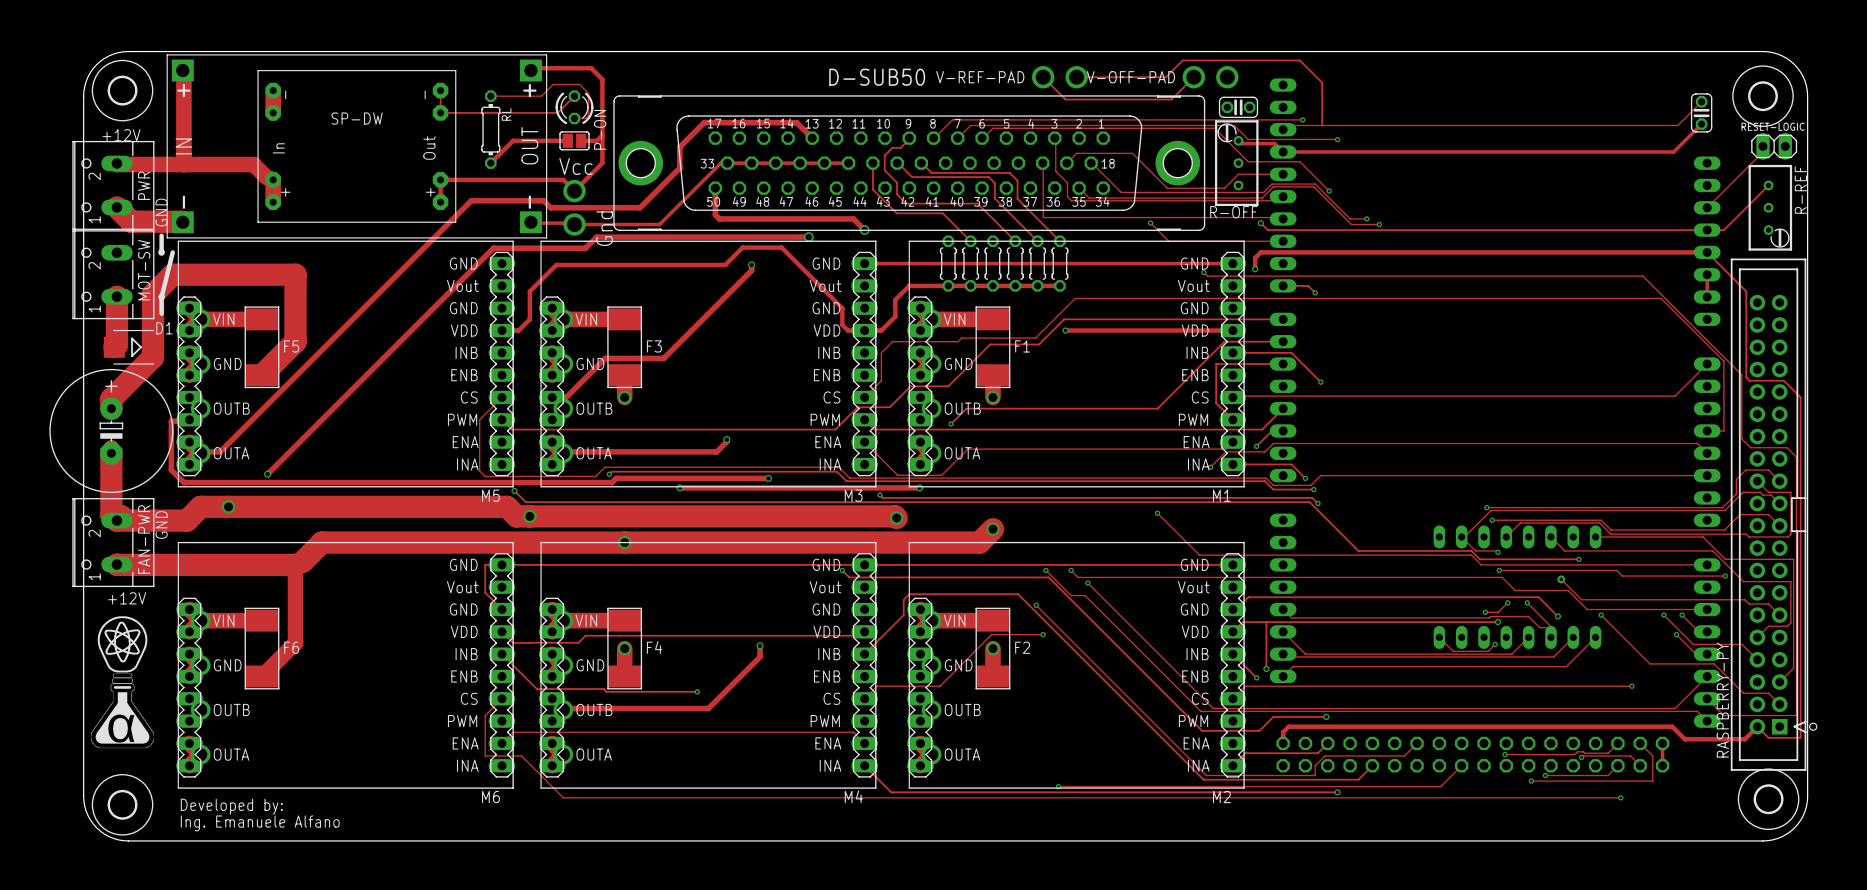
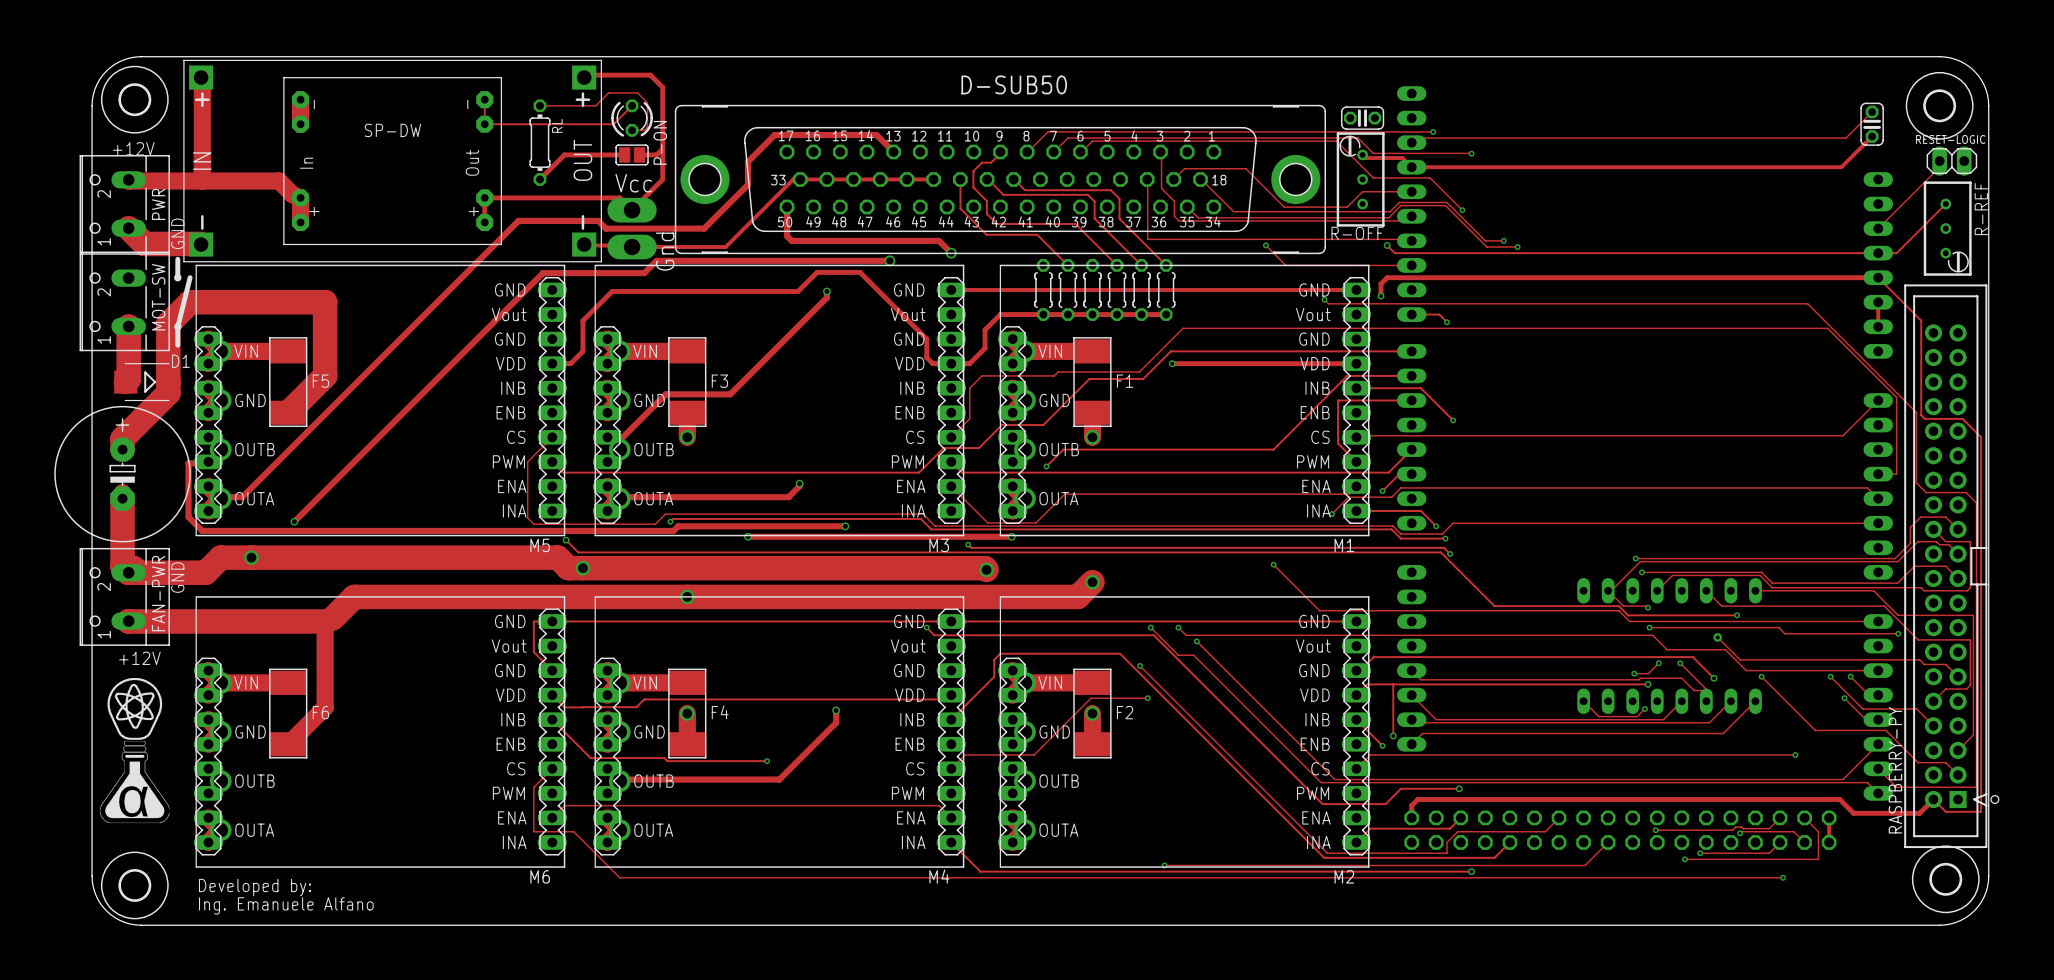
D-SUB50 name position: D-SUB50 (877, 77) -> D-SUB50 (1014, 84)
track: (1043, 77) (1065, 99) (1171, 99) (1193, 77) -> none
V-REF-PAD: (1059, 77) -> none
track: (1076, 77) (1165, 77) (1182, 60) (1299, 60) (1322, 82) (1322, 125) -> none
V-OFF-PAD: (1210, 77) -> none
part footprint: [563, 179, 586, 236] -> [607, 197, 657, 260]

